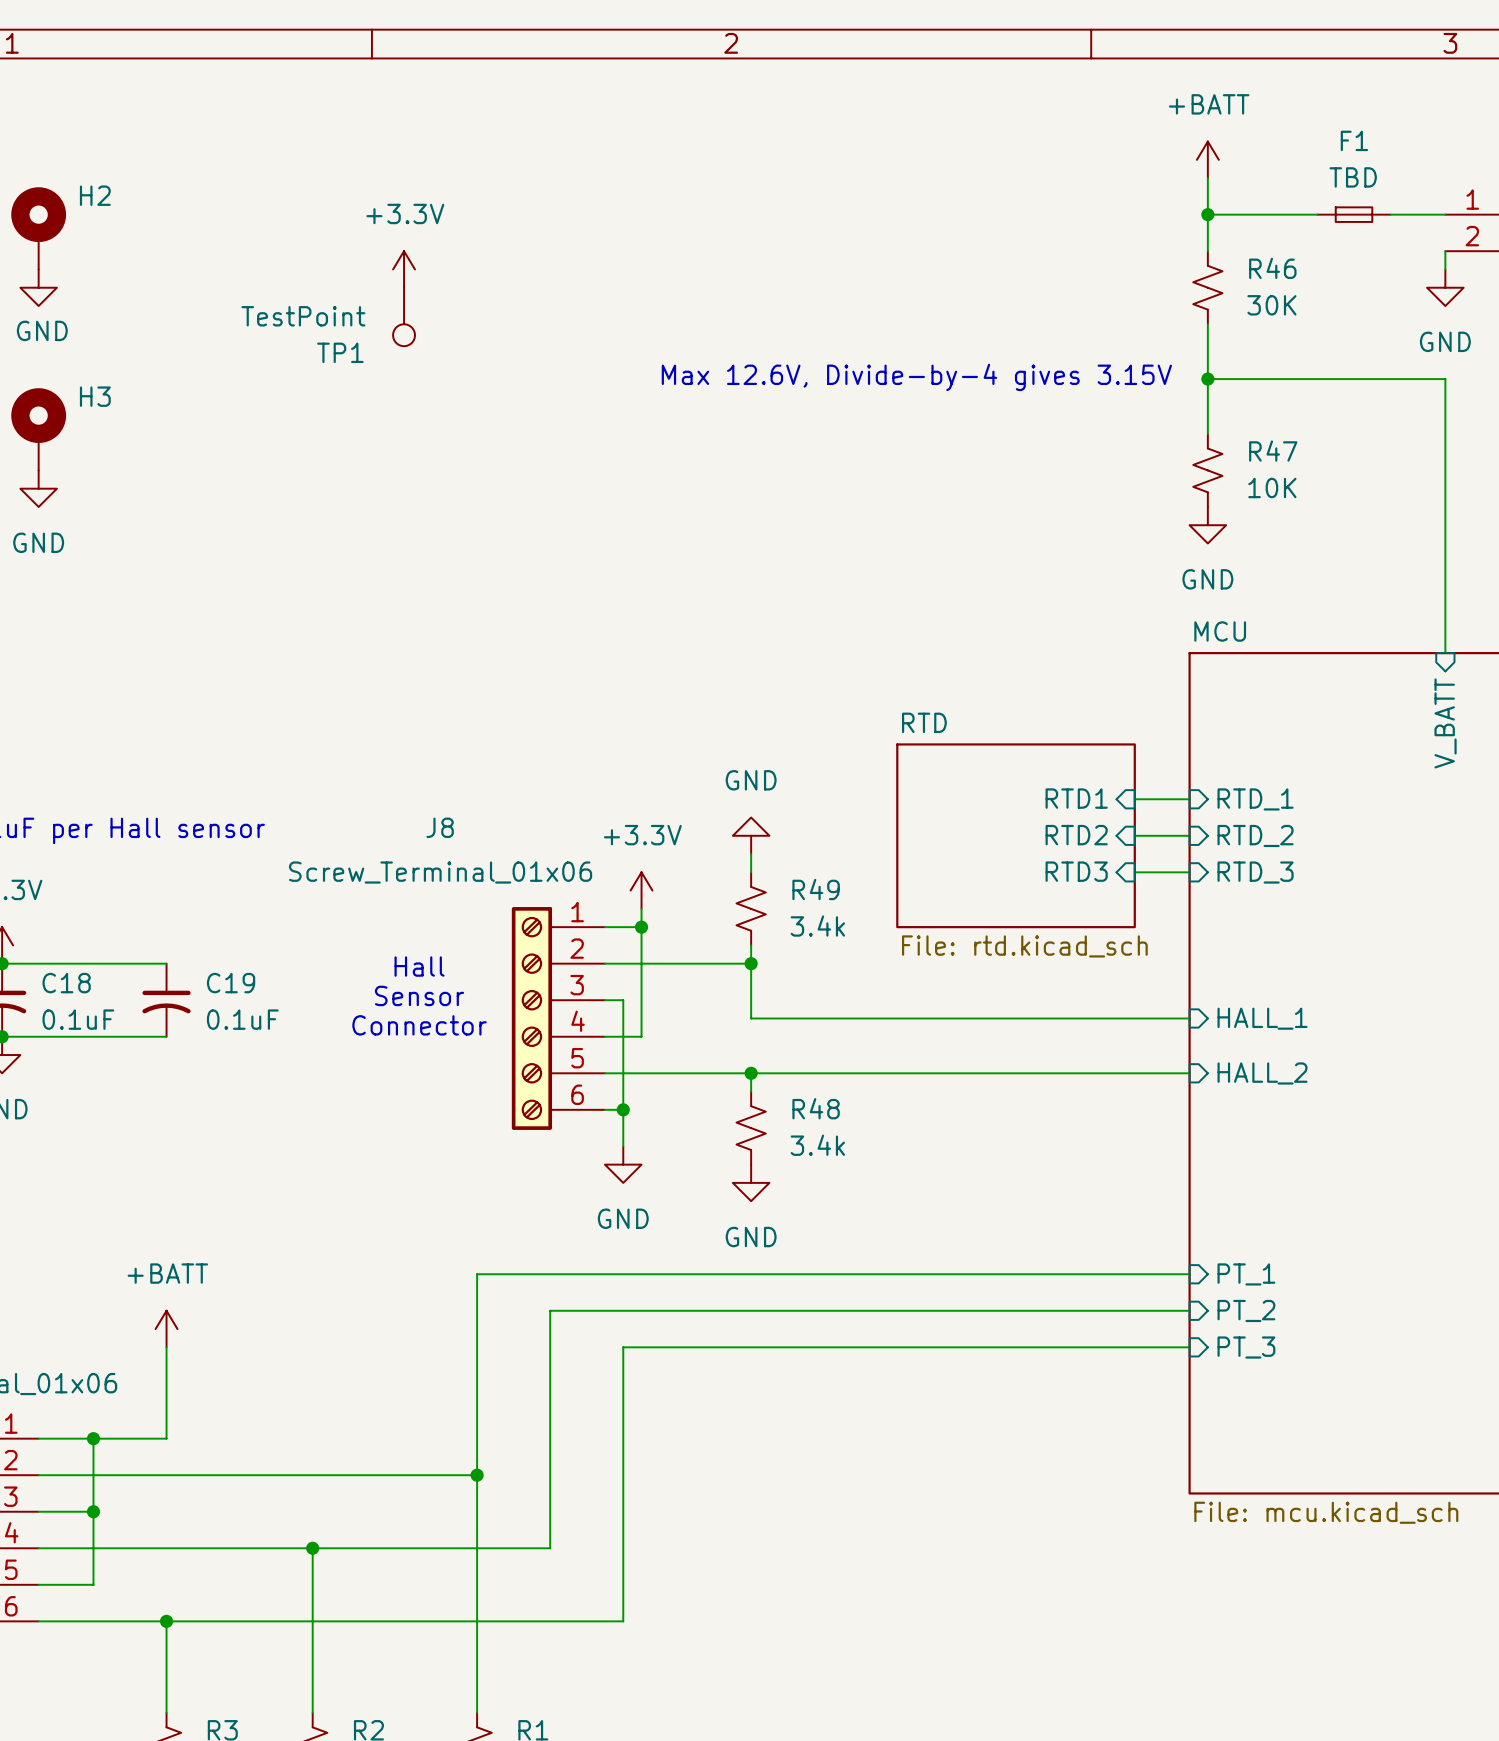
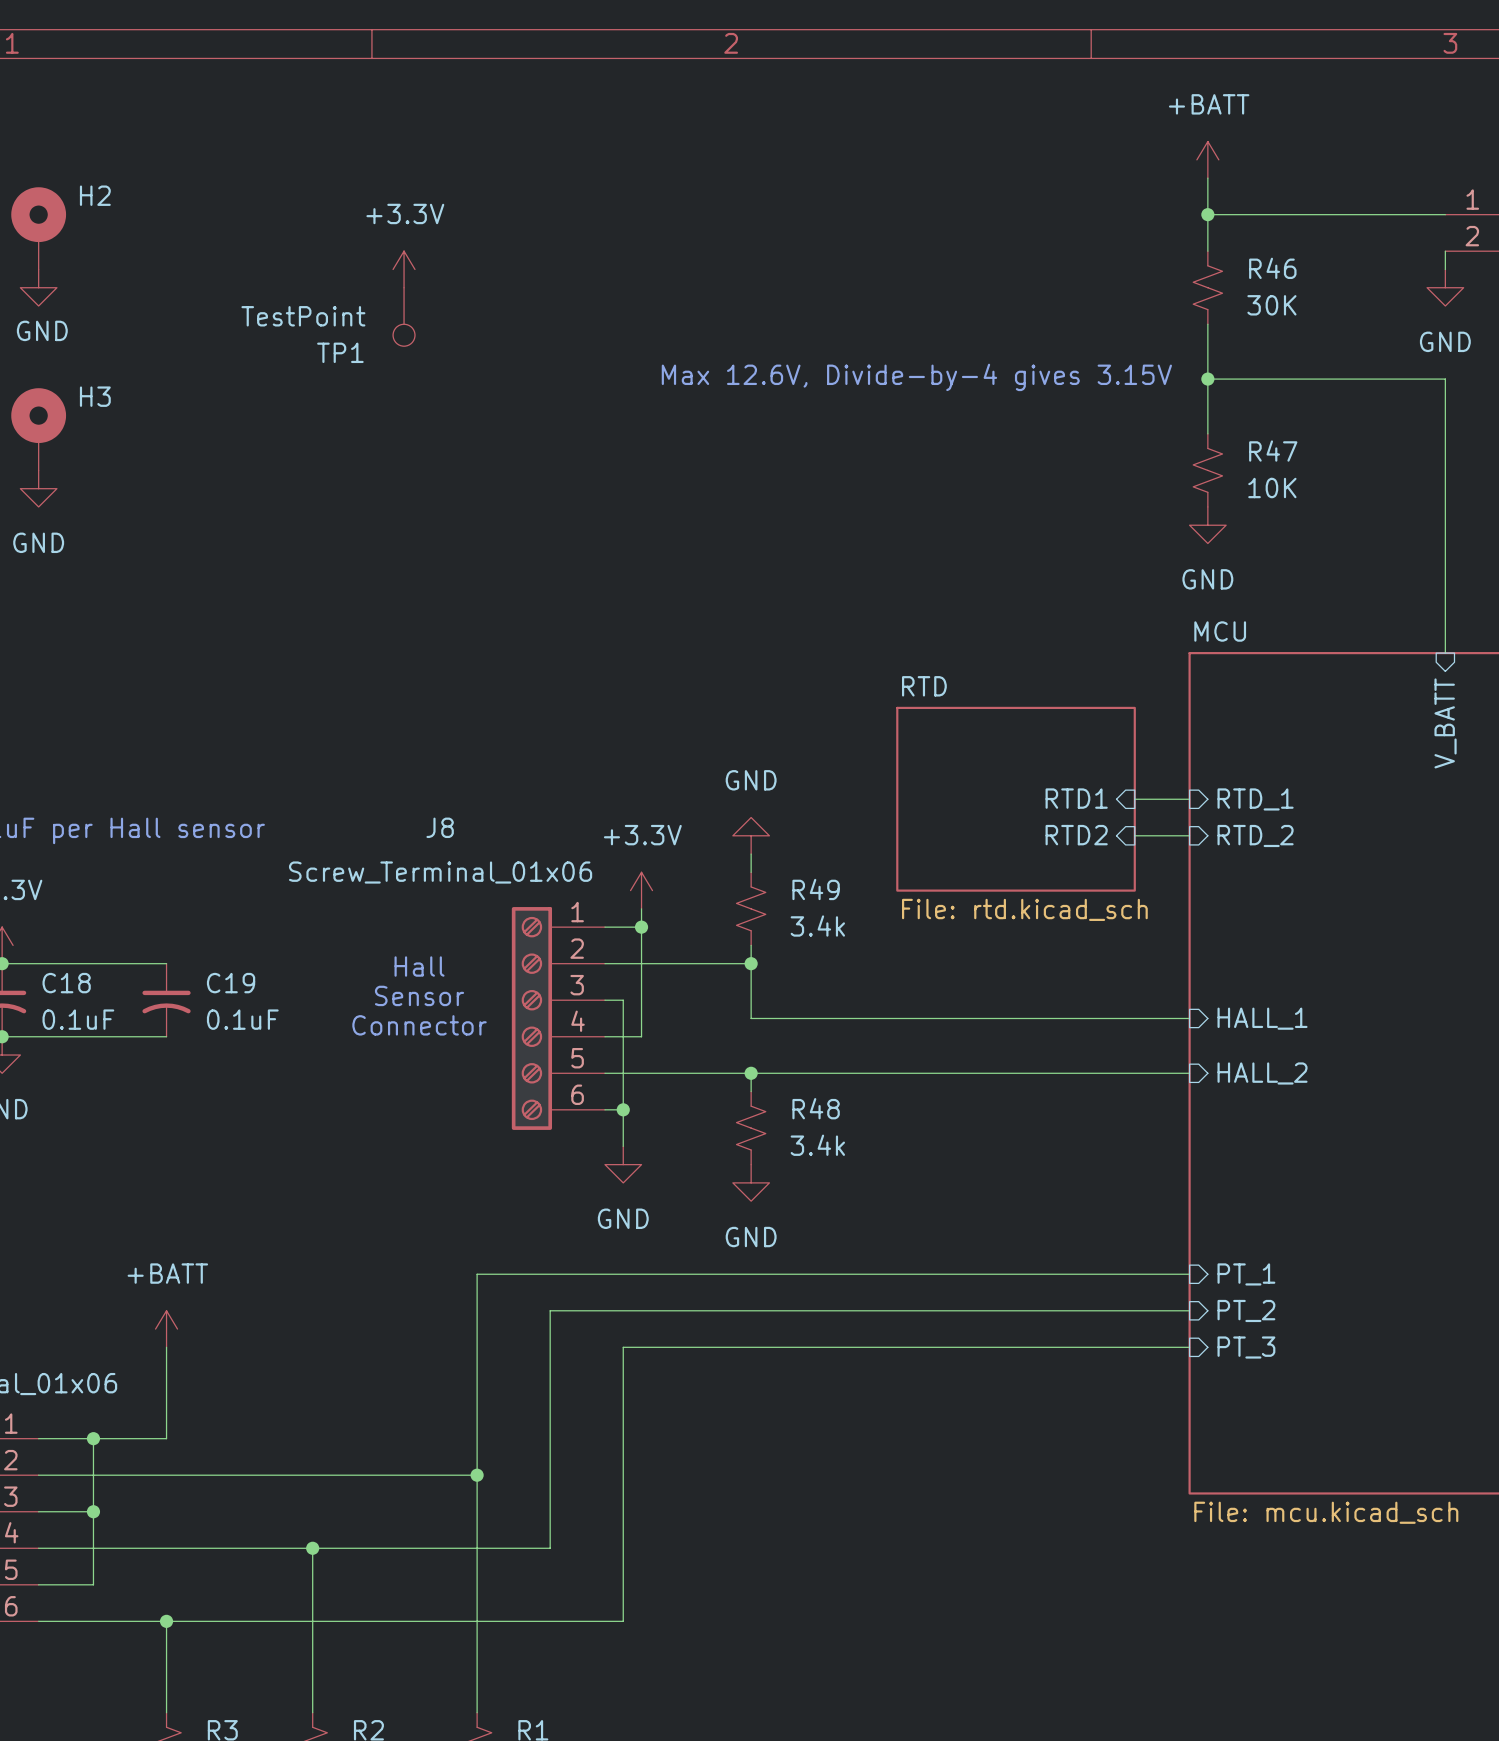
F1: TBD (1354, 214) -> none
sheet RTD position: (1016, 835) -> (1016, 799)
sheet pin: RTD3 (1076, 871) -> none
wire: (1134, 872) (1189, 872) -> none
sheet pin: RTD_3 (1255, 872) -> none

